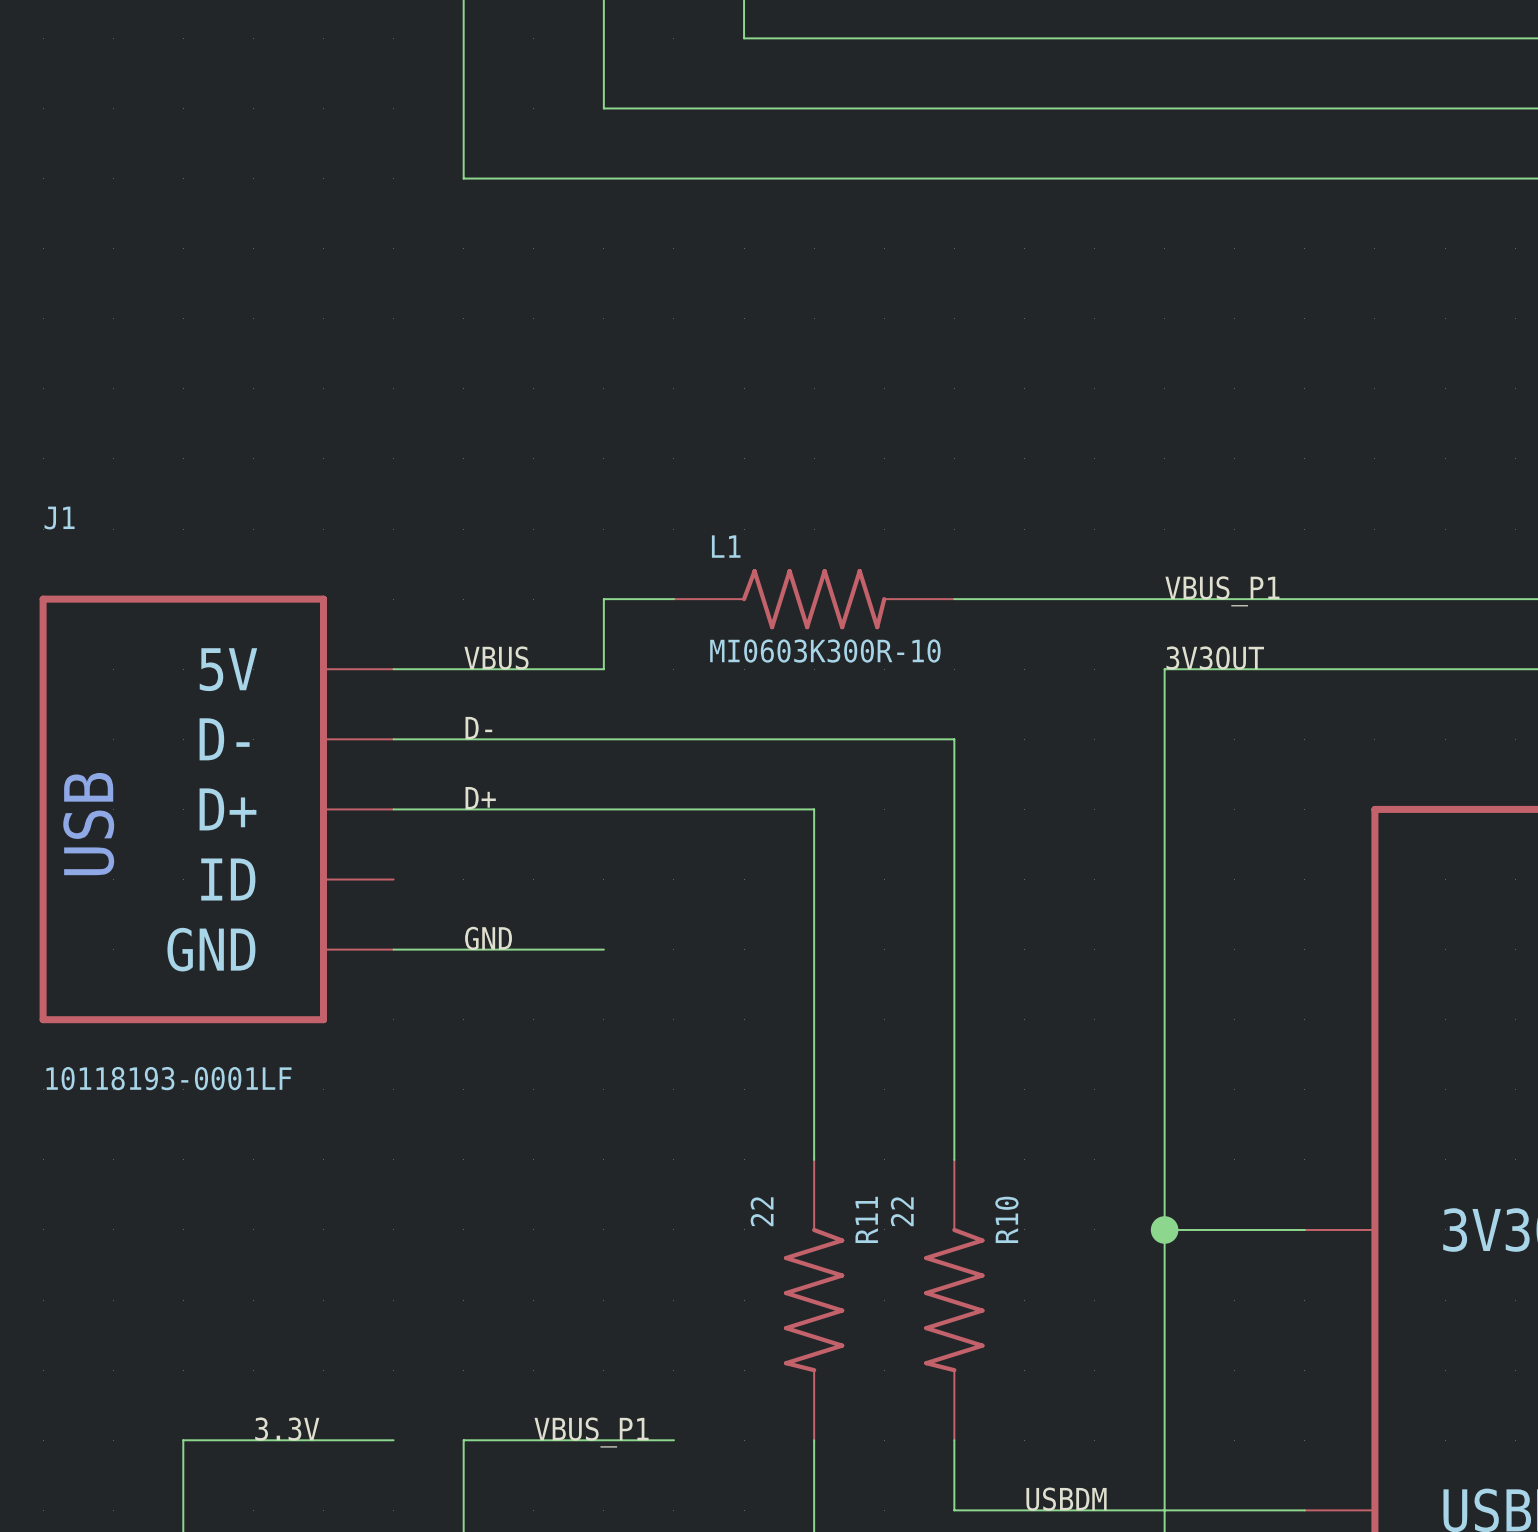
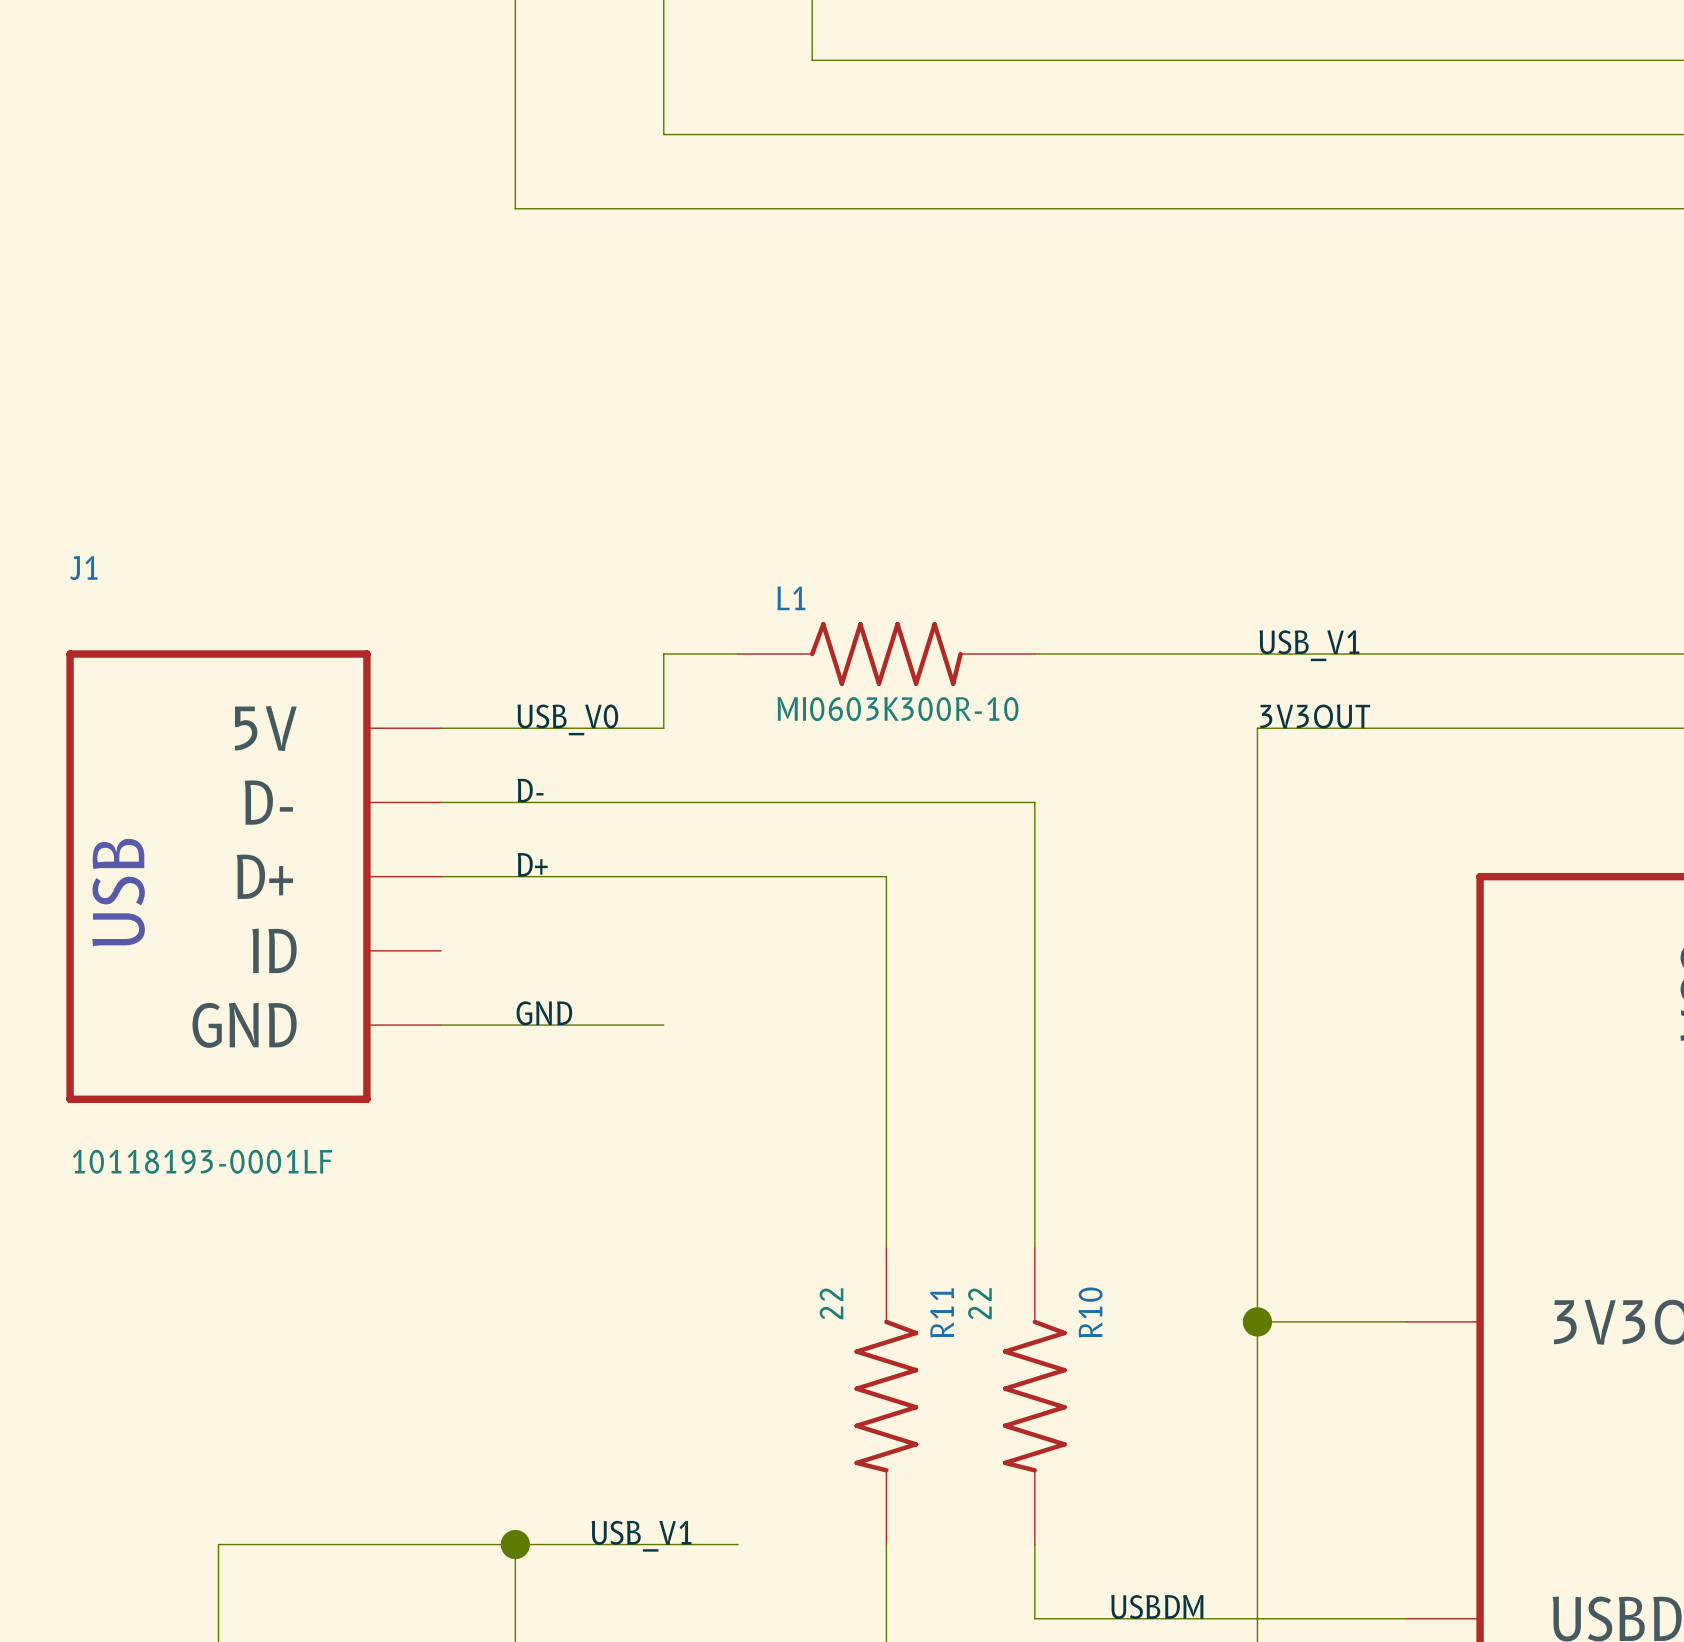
label: VBUS_P1 (1222, 591) -> USB_V1 (1309, 645)
label: VBUS (496, 658) -> USB_V0 (567, 719)
label: 3.3V (287, 1429) -> none
label: VBUS_P1 (591, 1432) -> USB_V1 (641, 1536)
wire: none -> (441, 1544) (515, 1544)
junction: none -> (515, 1544)

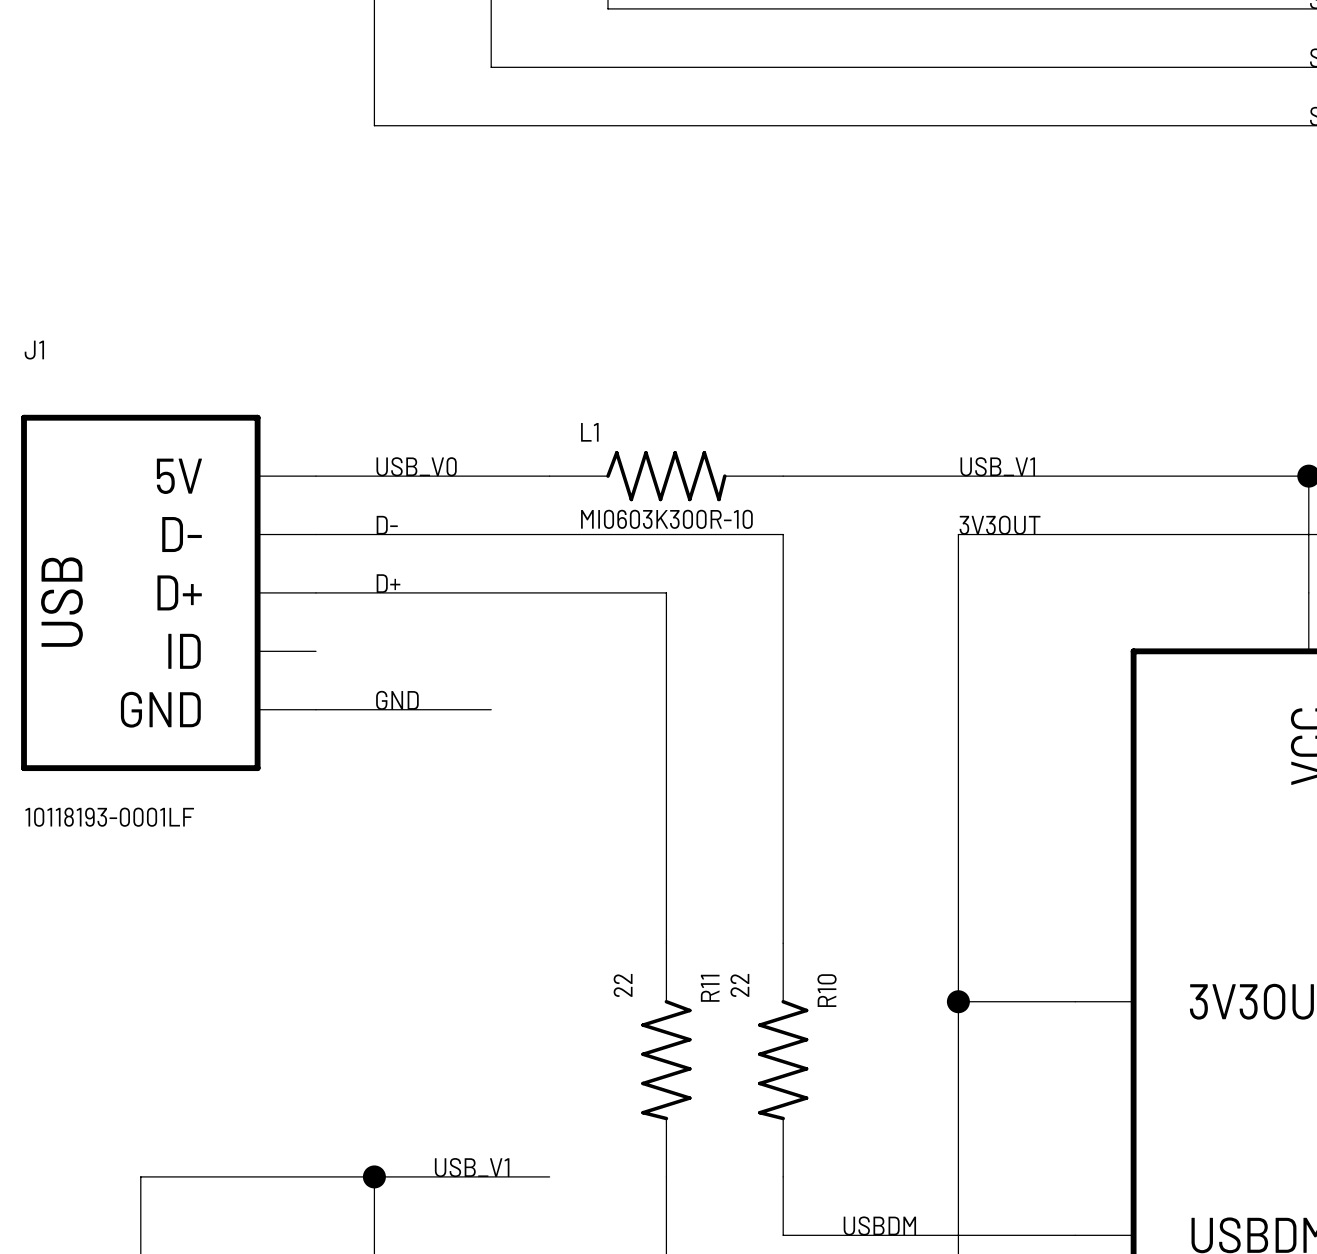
label: none -> USB_V0 (416, 466)
wire: (663, 654) (663, 728) -> (491, 476) (316, 476)
label: USB_V0 (567, 719) -> D- (387, 525)
wire: none -> (491, 534) (783, 534) (783, 592)
label: D- (530, 790) -> D+ (388, 583)
wire: (886, 802) (1034, 802) -> (666, 592) (666, 651)
label: D+ (532, 864) -> none
J1 position: (253, 876) -> (168, 592)
wire: (441, 876) (886, 876) -> none
label position: GND (544, 1013) -> GND (397, 700)
wire: (441, 1025) (663, 1025) -> (316, 709) (491, 709)

